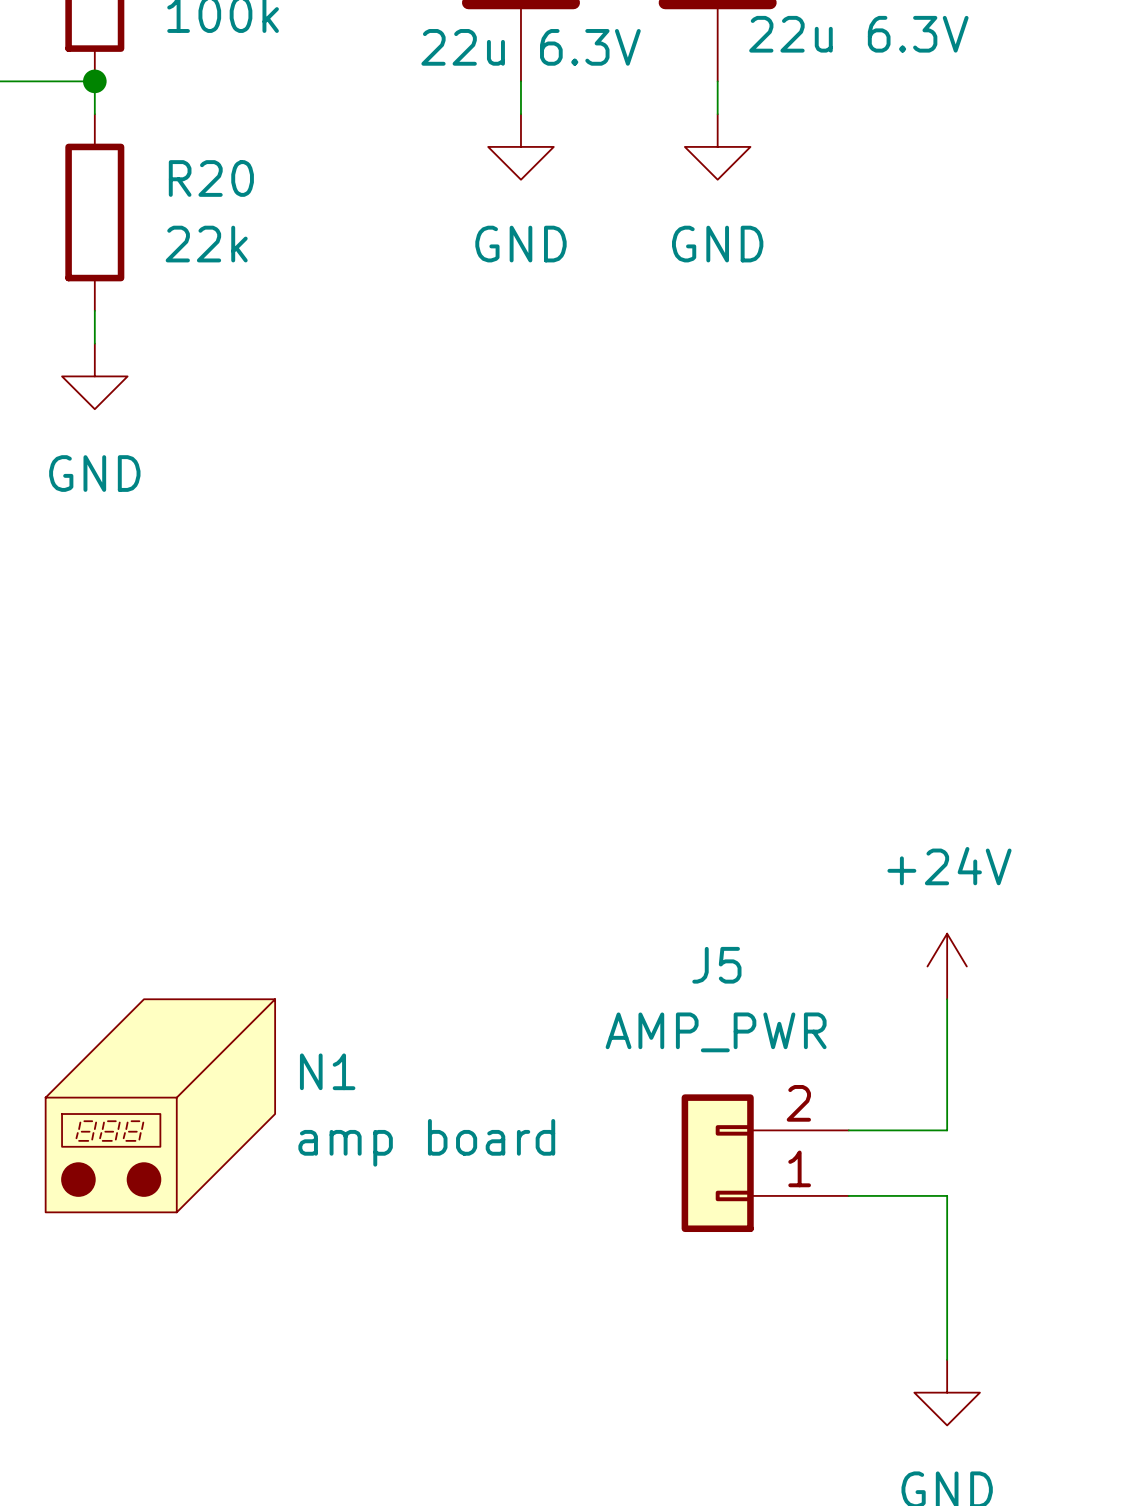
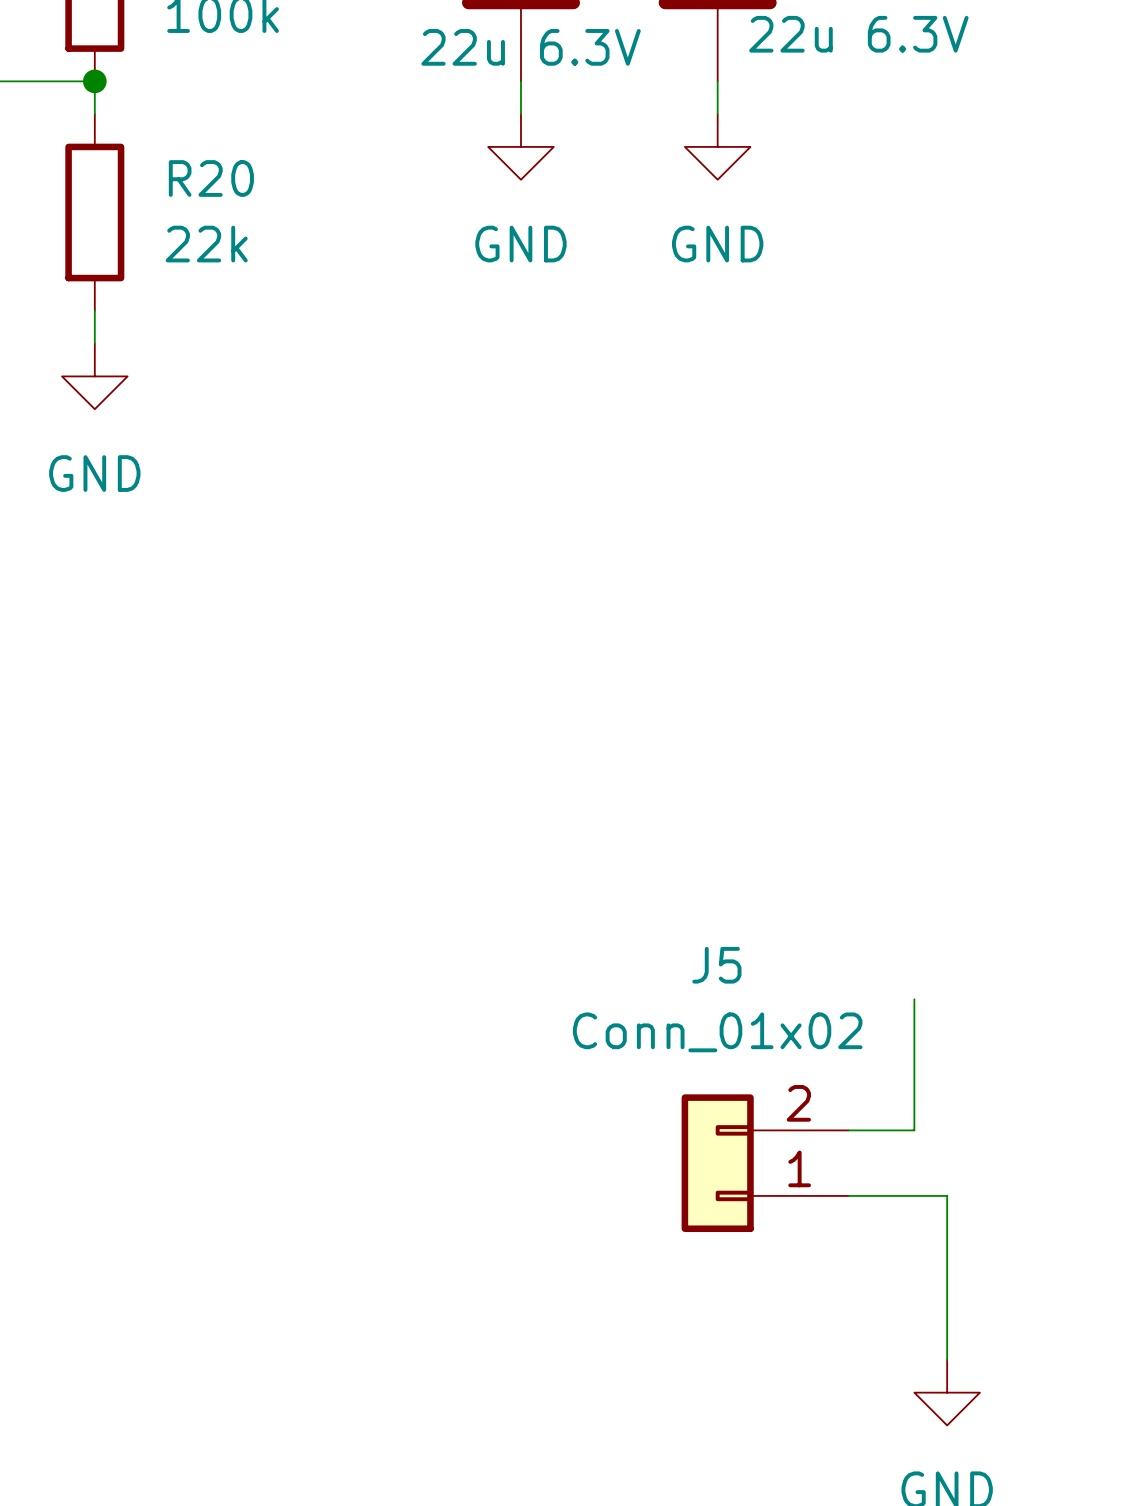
power symbol: +24V (947, 966) -> none
wire: (947, 999) (947, 1130) (914, 1130) -> (914, 999) (914, 1130)
J5 value: AMP_PWR (716, 1032) -> Conn_01x02 (717, 1032)
N1: amp board (160, 1105) -> none

